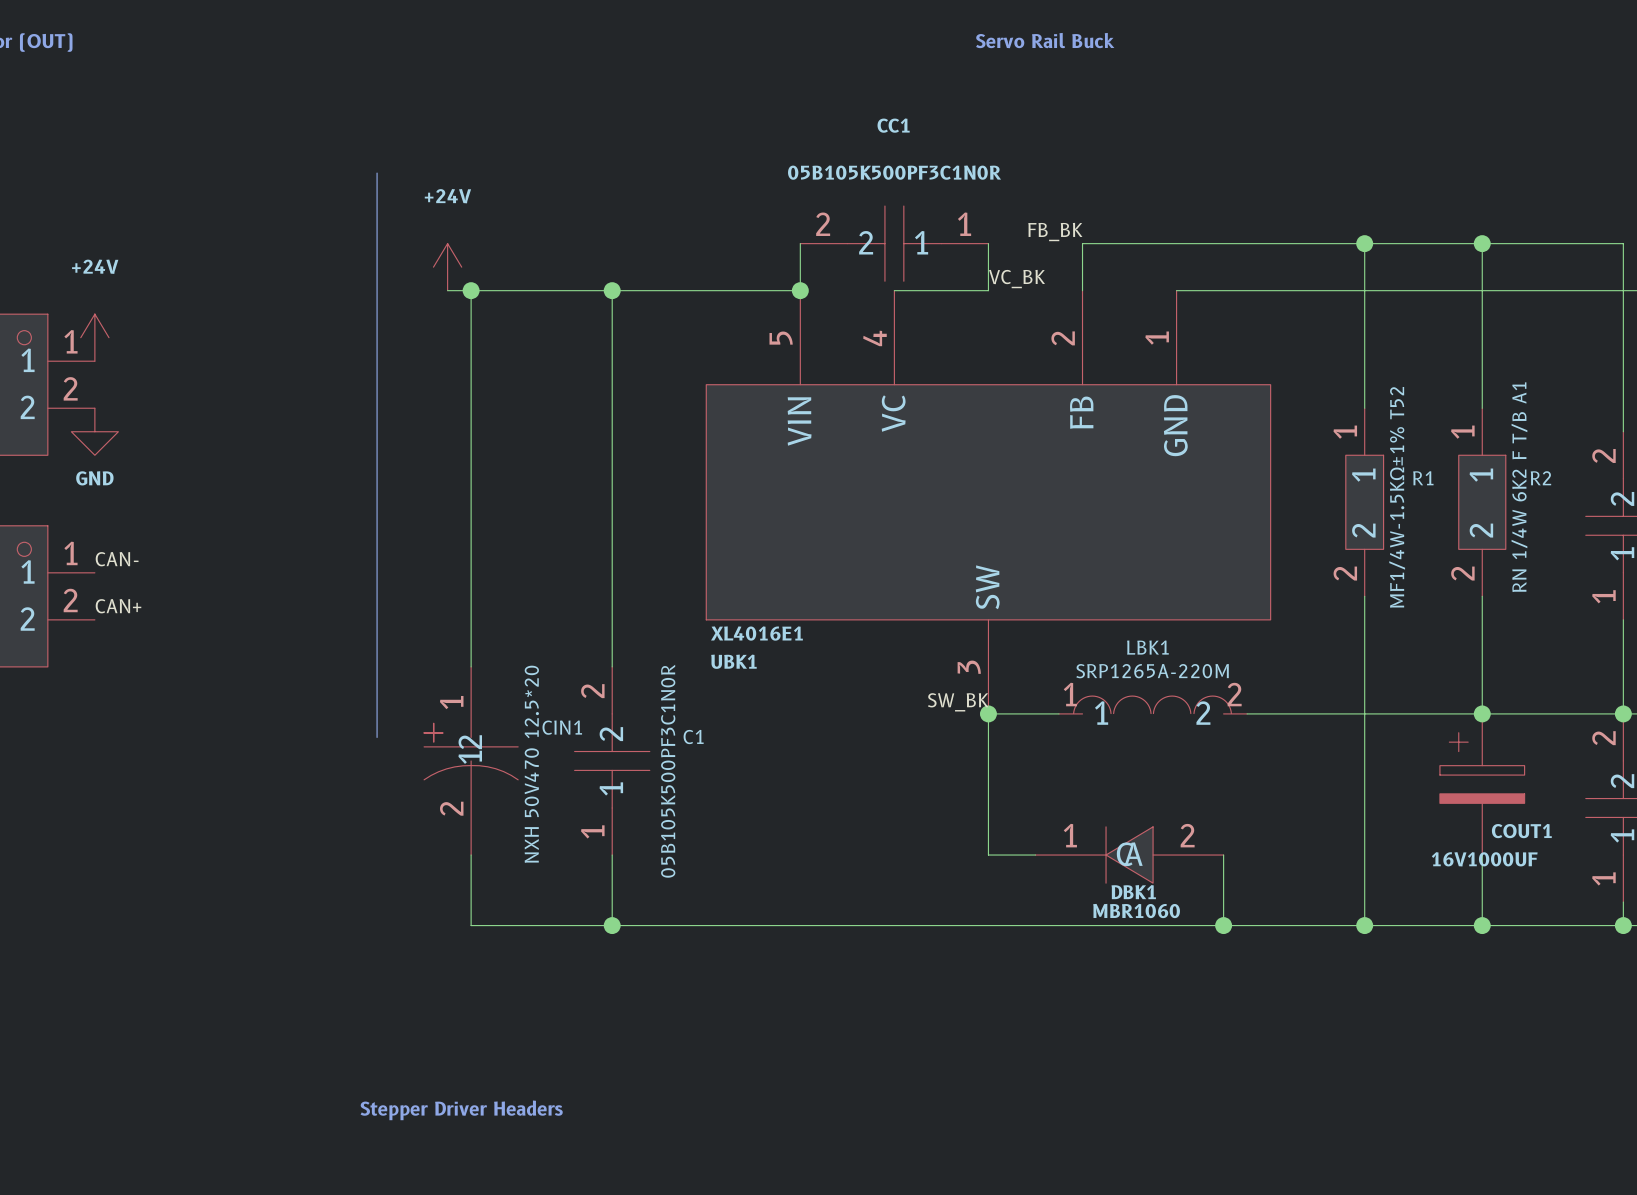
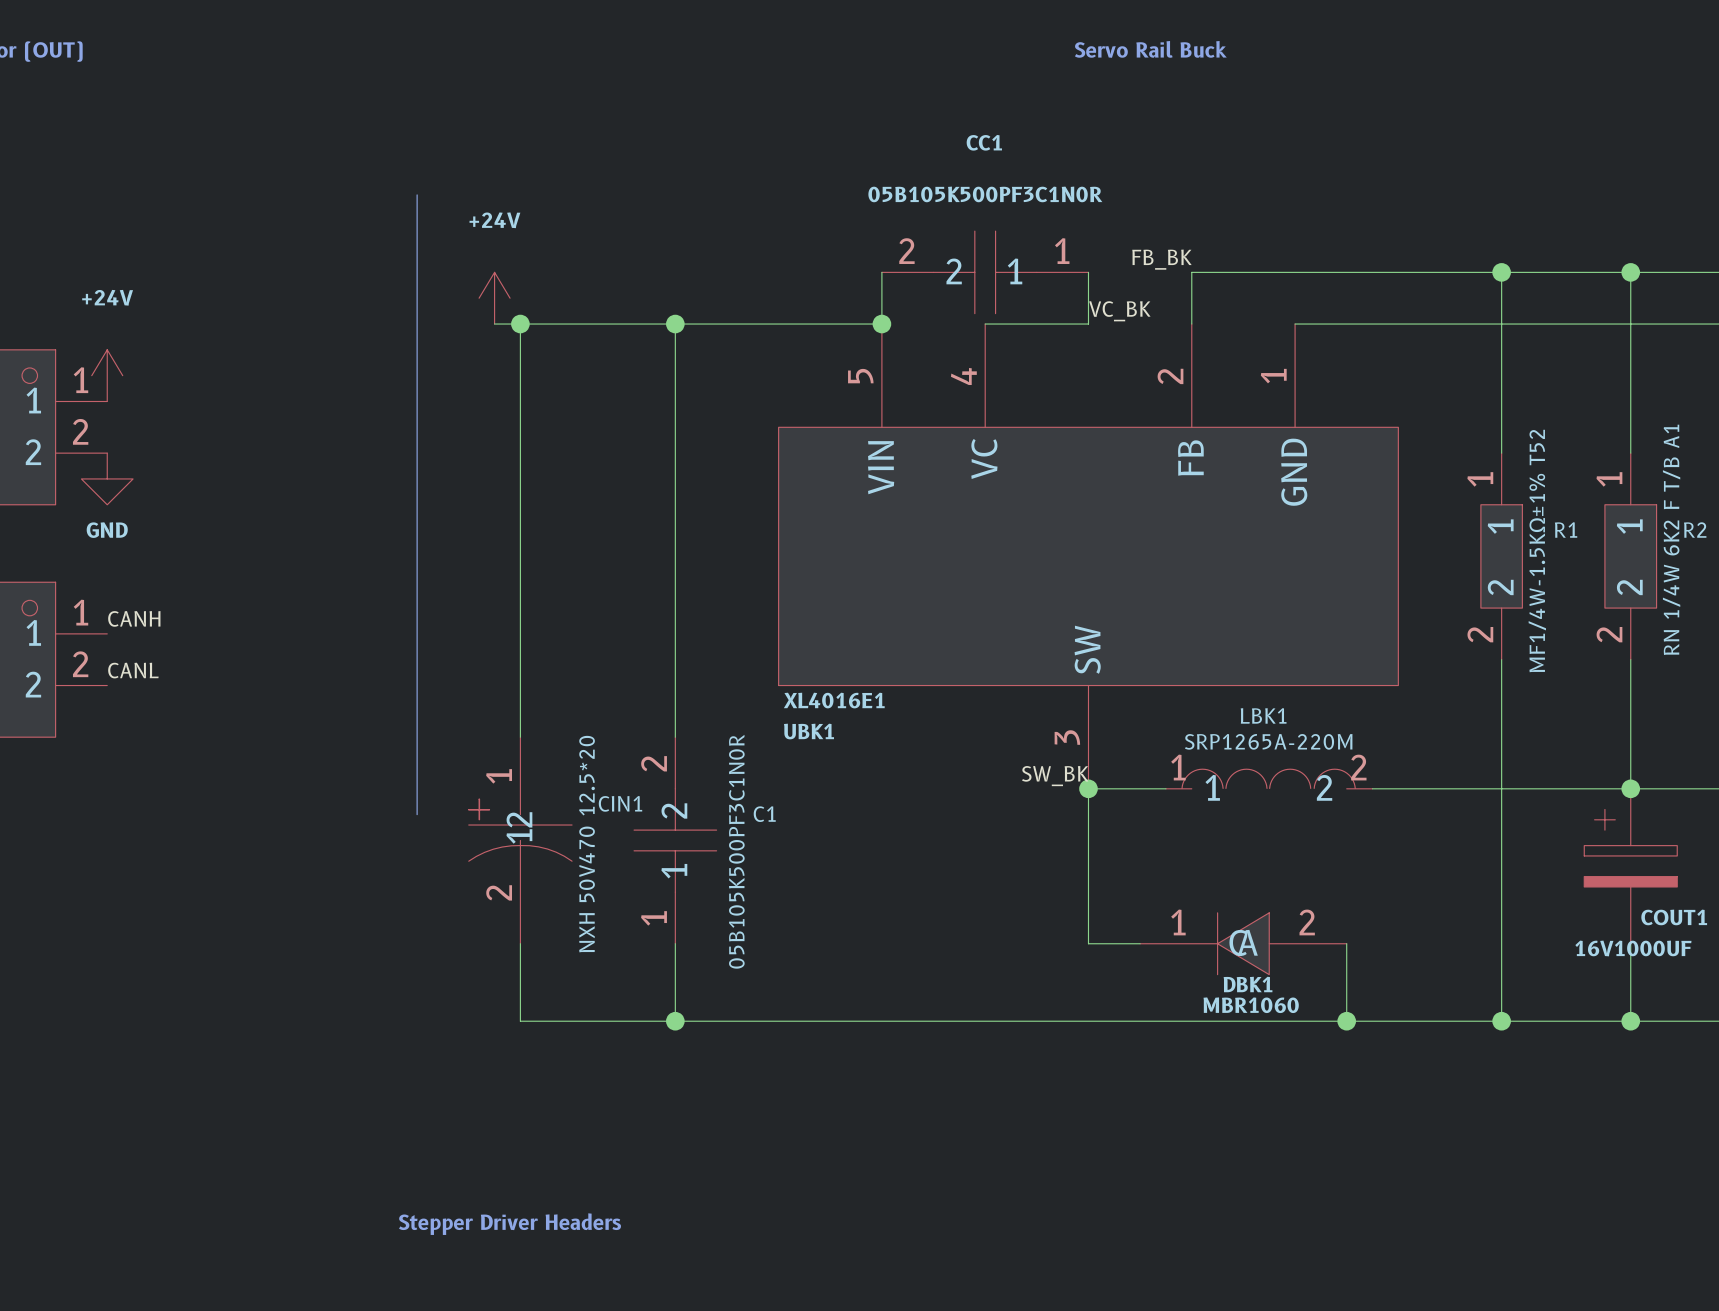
label: CAN- (117, 559) -> CANH (134, 618)
label: CAN+ (118, 606) -> CANL (133, 670)

